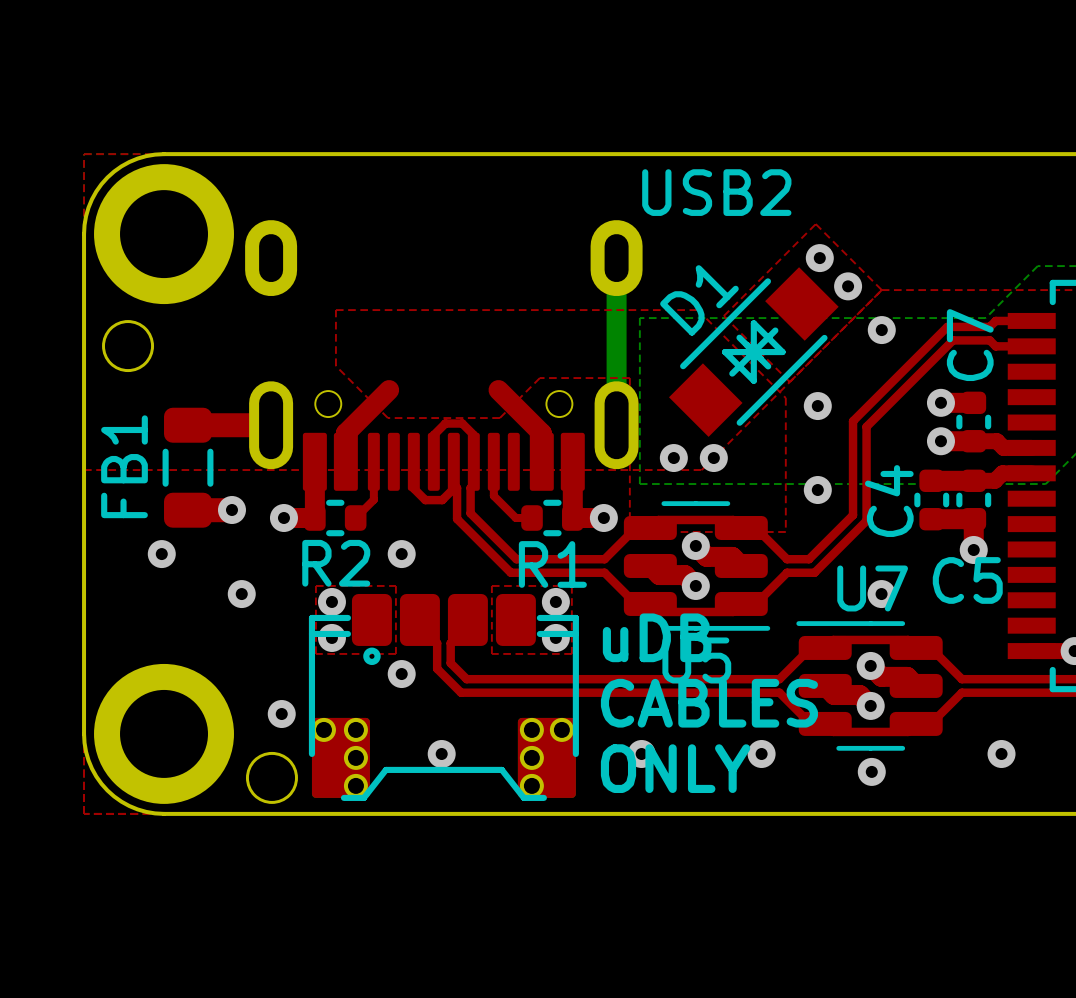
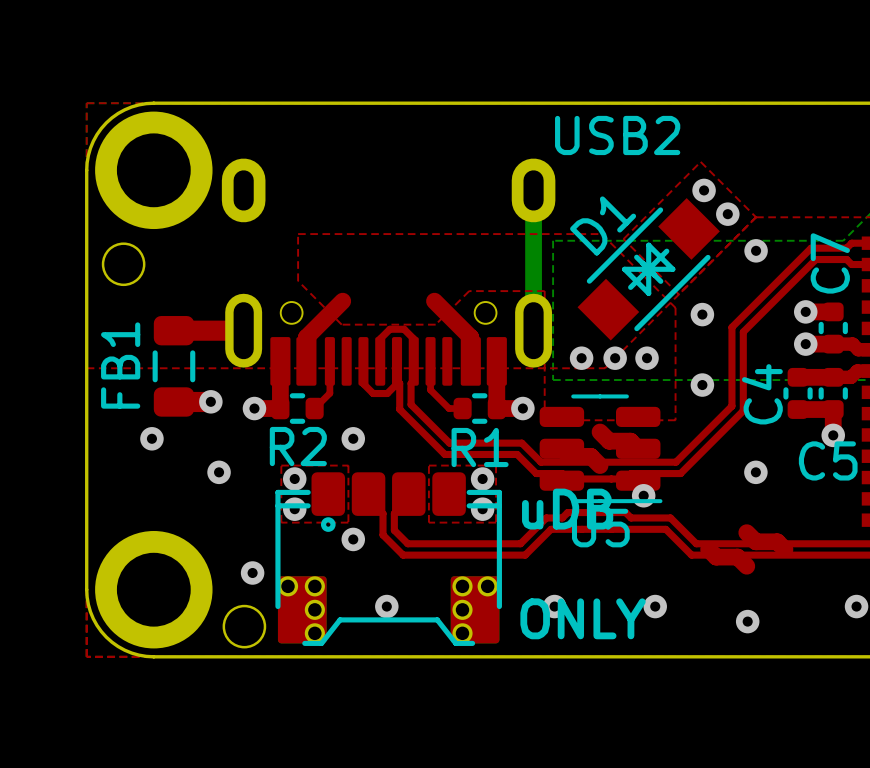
via: none -> (647, 358)
via: (695, 545) -> none
top track: (602, 559) (635, 528) (650, 528) (658, 520) (733, 520) (741, 528) (755, 528) (787, 559) (809, 559) -> (521, 443) (540, 462) (675, 462) (695, 443)
top track: (597, 572) (604, 572) (635, 603) (650, 603) (658, 611) (733, 611) (741, 603) (755, 603) (787, 572) (814, 572) -> (517, 454) (536, 473) (562, 473) (567, 478) (625, 478) (631, 473) (680, 473) (699, 454)
via: (695, 585) -> none
via: none -> (643, 495)
via: (870, 665) -> none
top track: (601, 679) (779, 679) (810, 647) (825, 647) (833, 639) (908, 639) (916, 647) (930, 647) (961, 679) -> (520, 543) (546, 517) (562, 517) (567, 512) (625, 512) (631, 517) (670, 517) (696, 543) (823, 543)
U7: (869, 685) -> none
top track: (606, 692) (779, 692) (810, 723) (825, 723) (833, 731) (908, 731) (916, 723) (930, 723) (961, 692) -> (525, 555) (551, 529) (665, 529) (691, 555) (823, 555)
text: CABLES (709, 703) -> none
via: (870, 705) -> none

